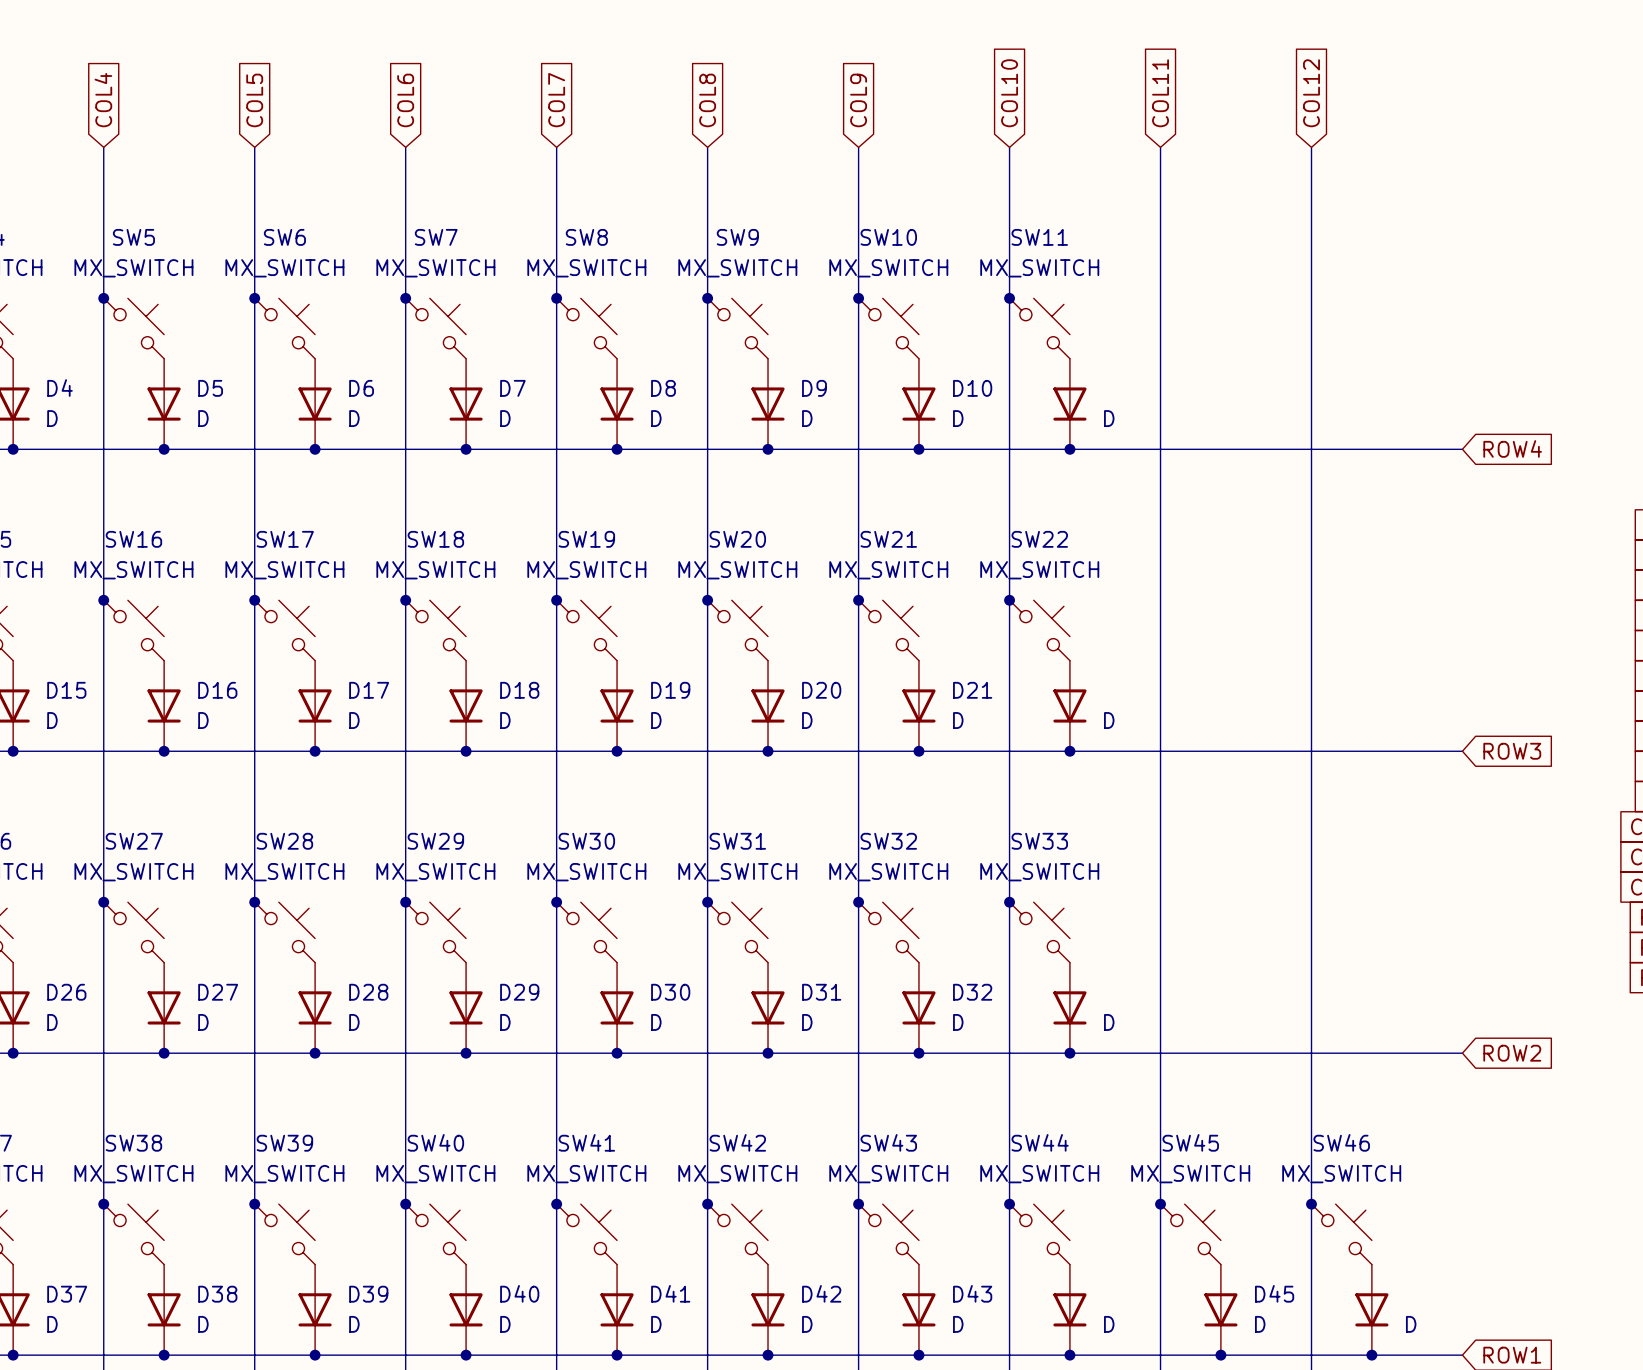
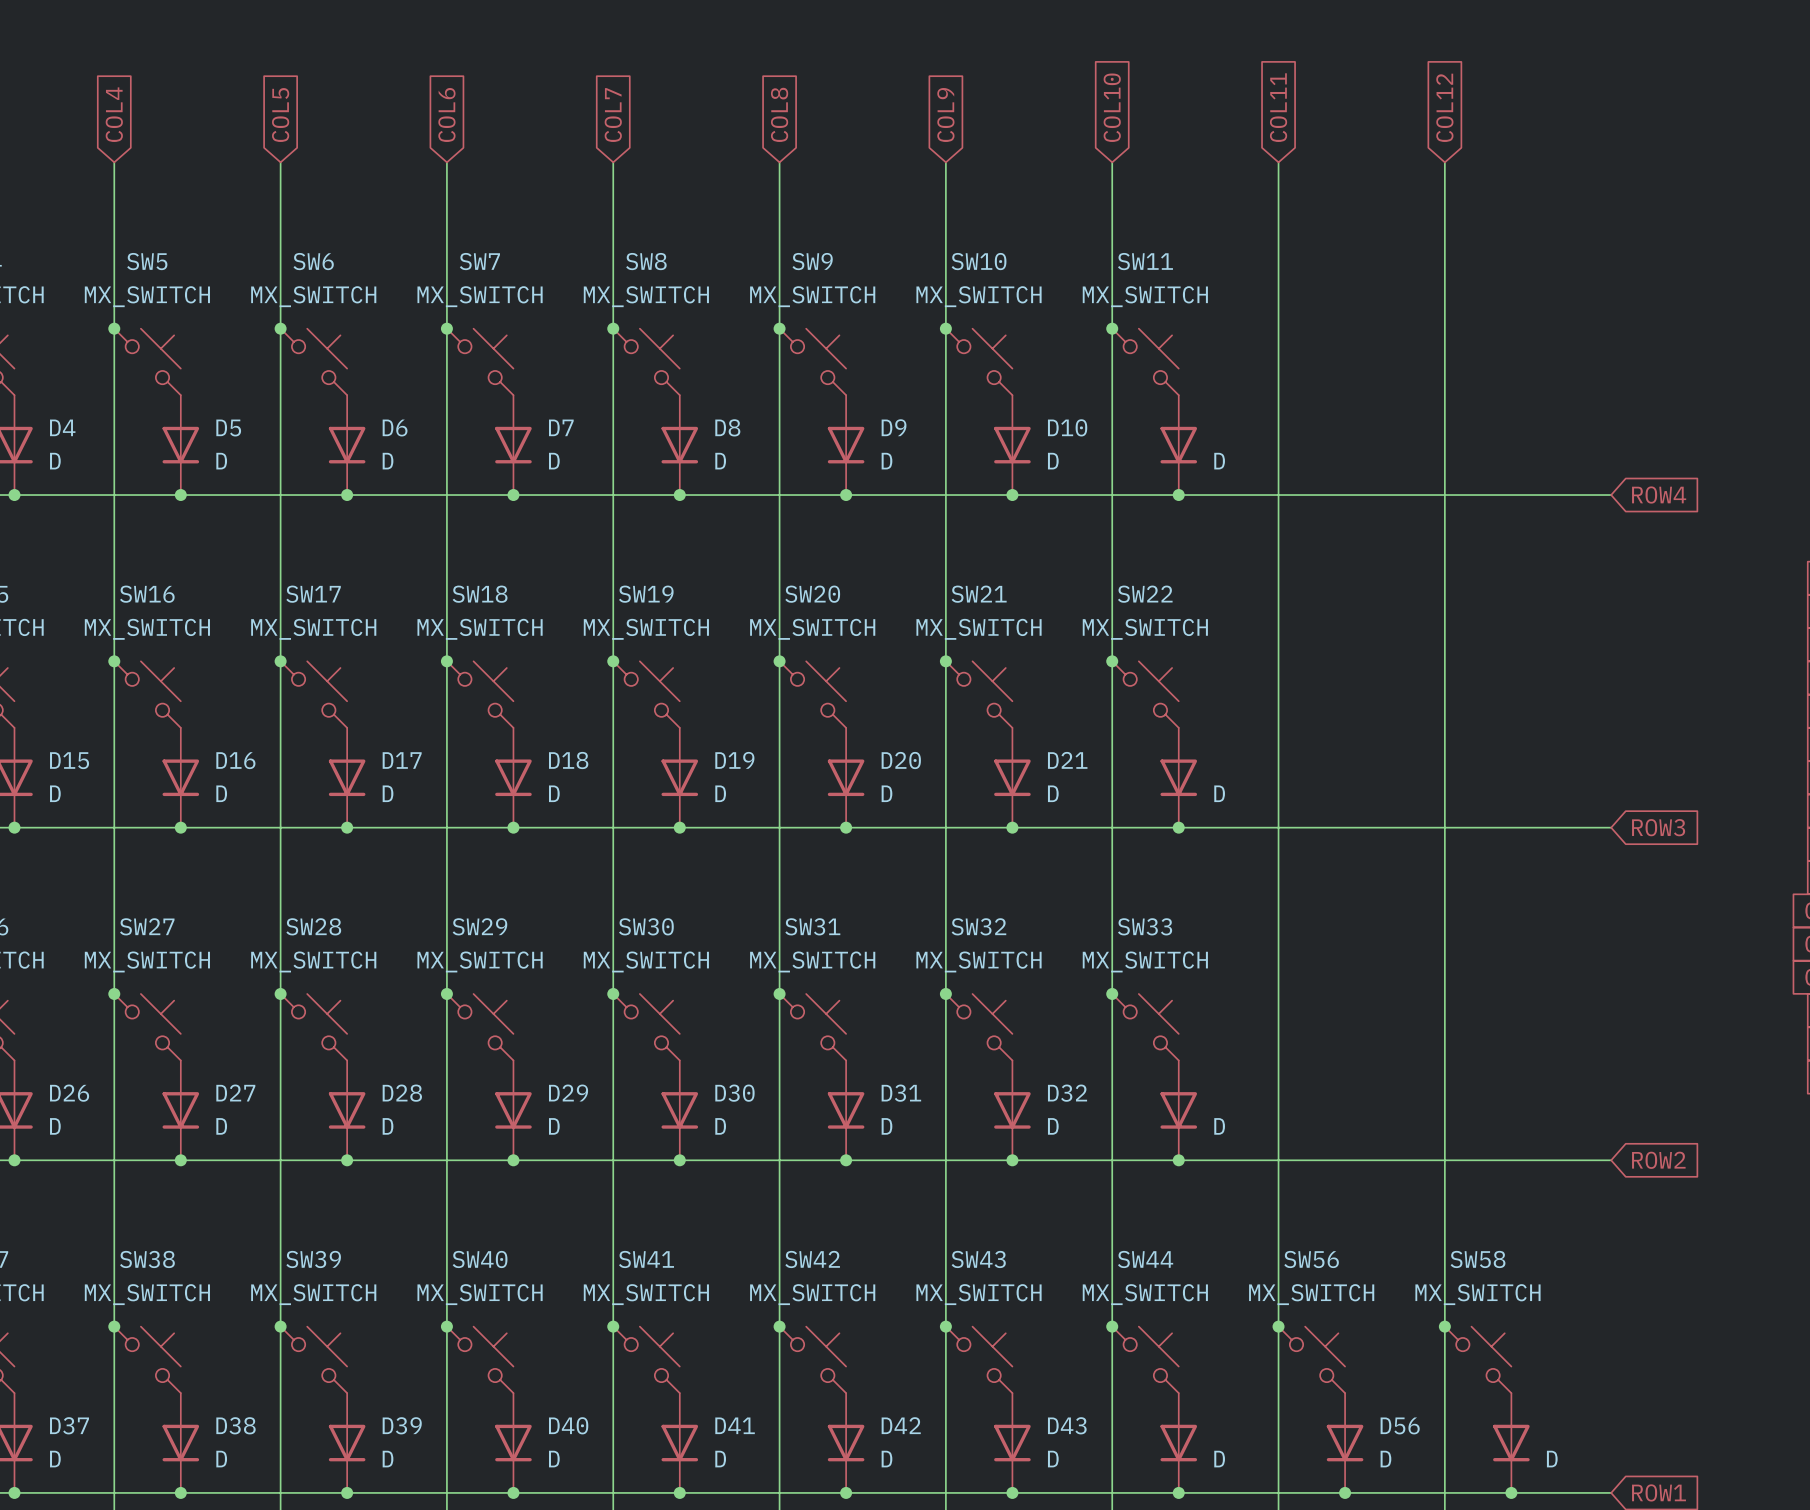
SW45 name: SW45 (1190, 1142) -> SW56 (1311, 1259)
SW46 name: SW46 (1341, 1142) -> SW58 (1478, 1259)
D45 name: D45 (1274, 1293) -> D56 (1400, 1425)

